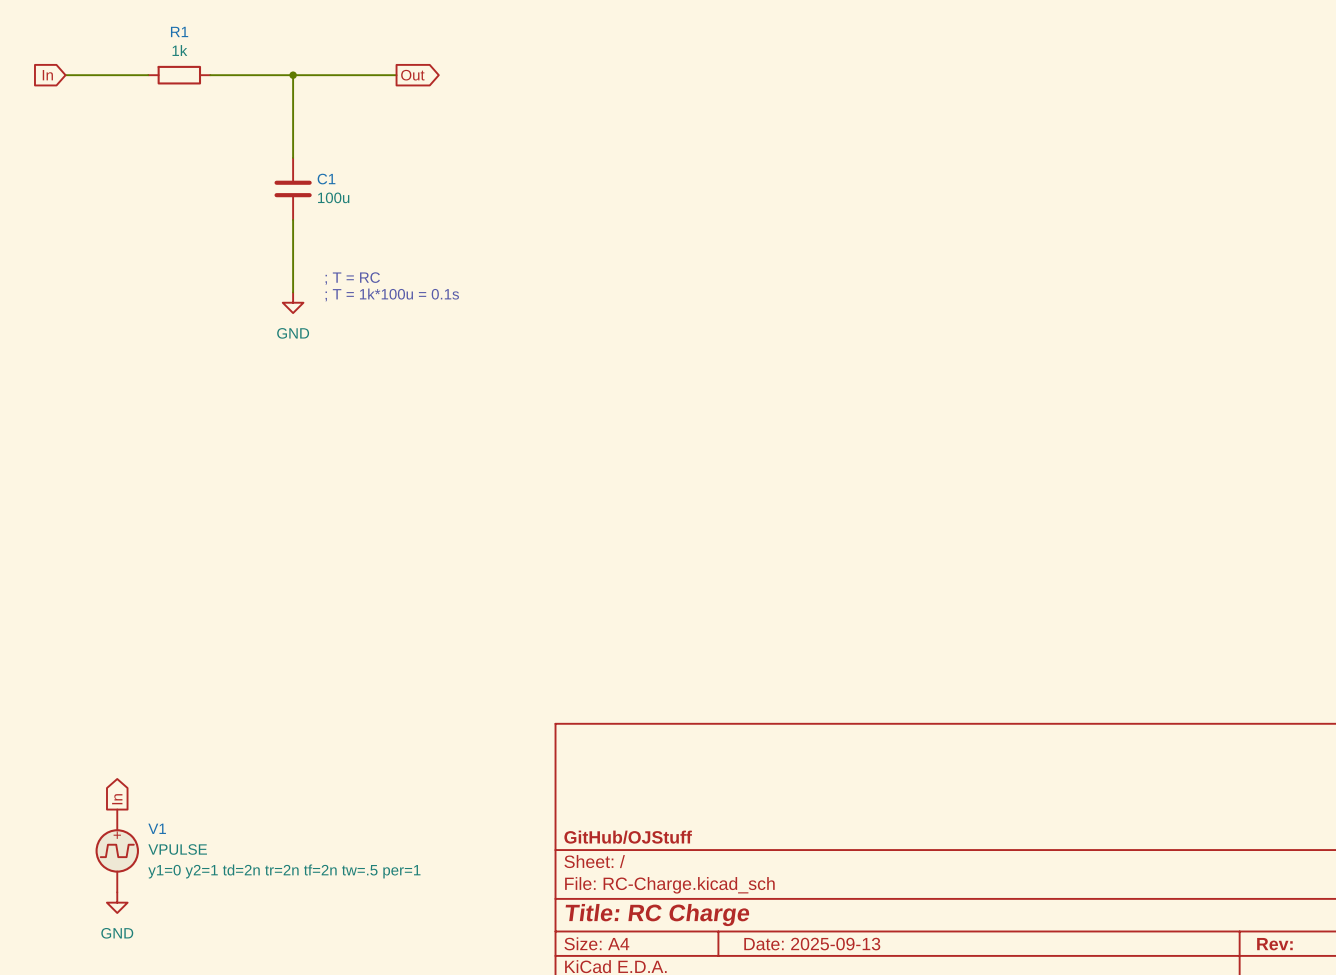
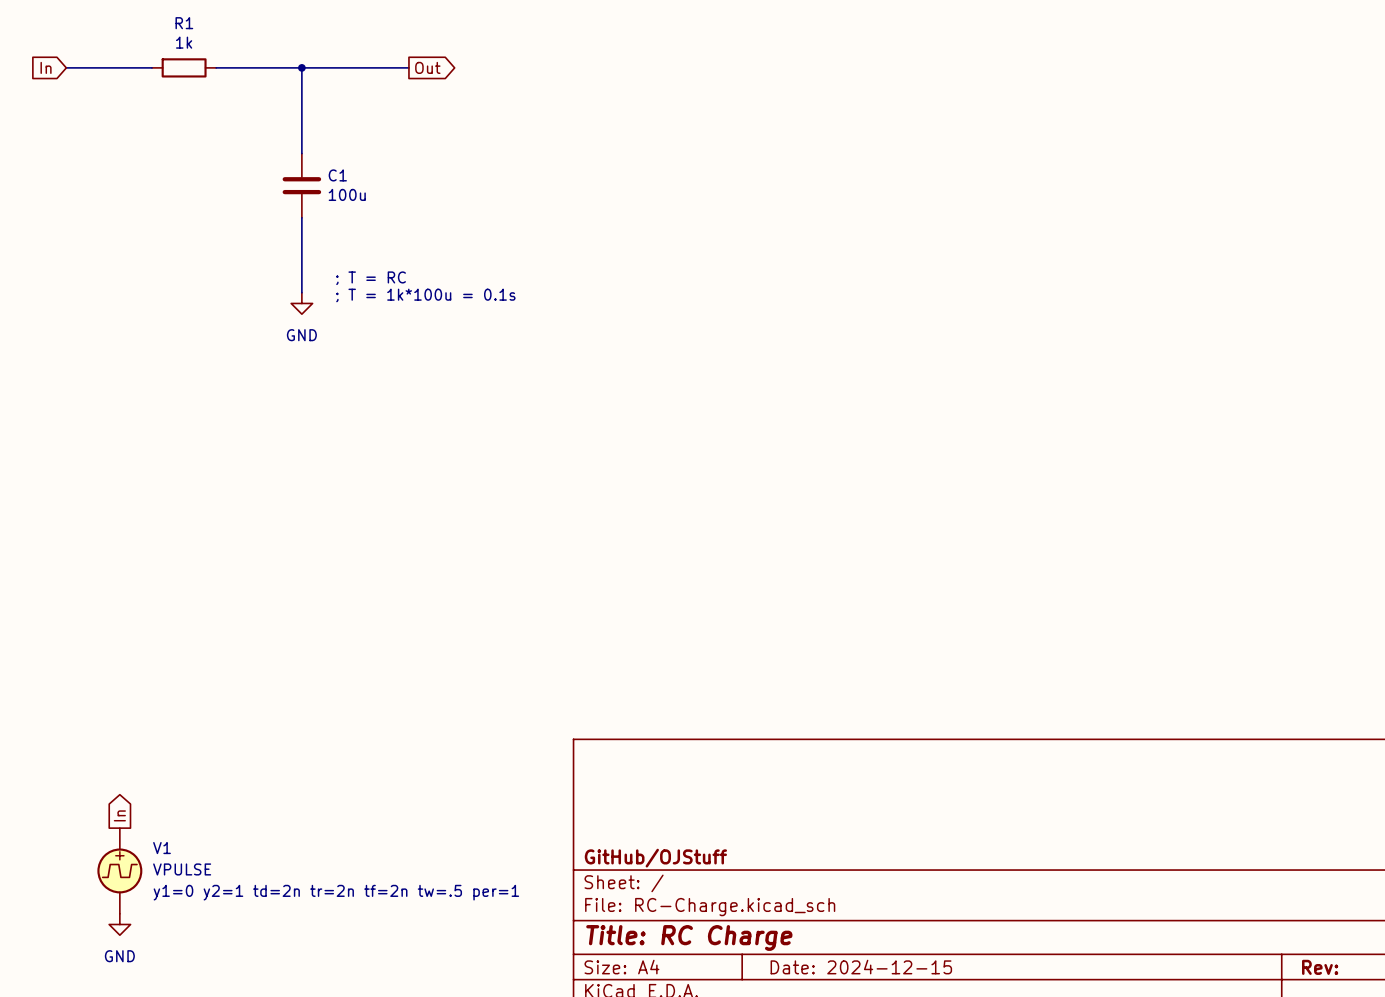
title block: Date: 2025-09-13 (812, 944) -> Date: 2024-12-15 (861, 967)

